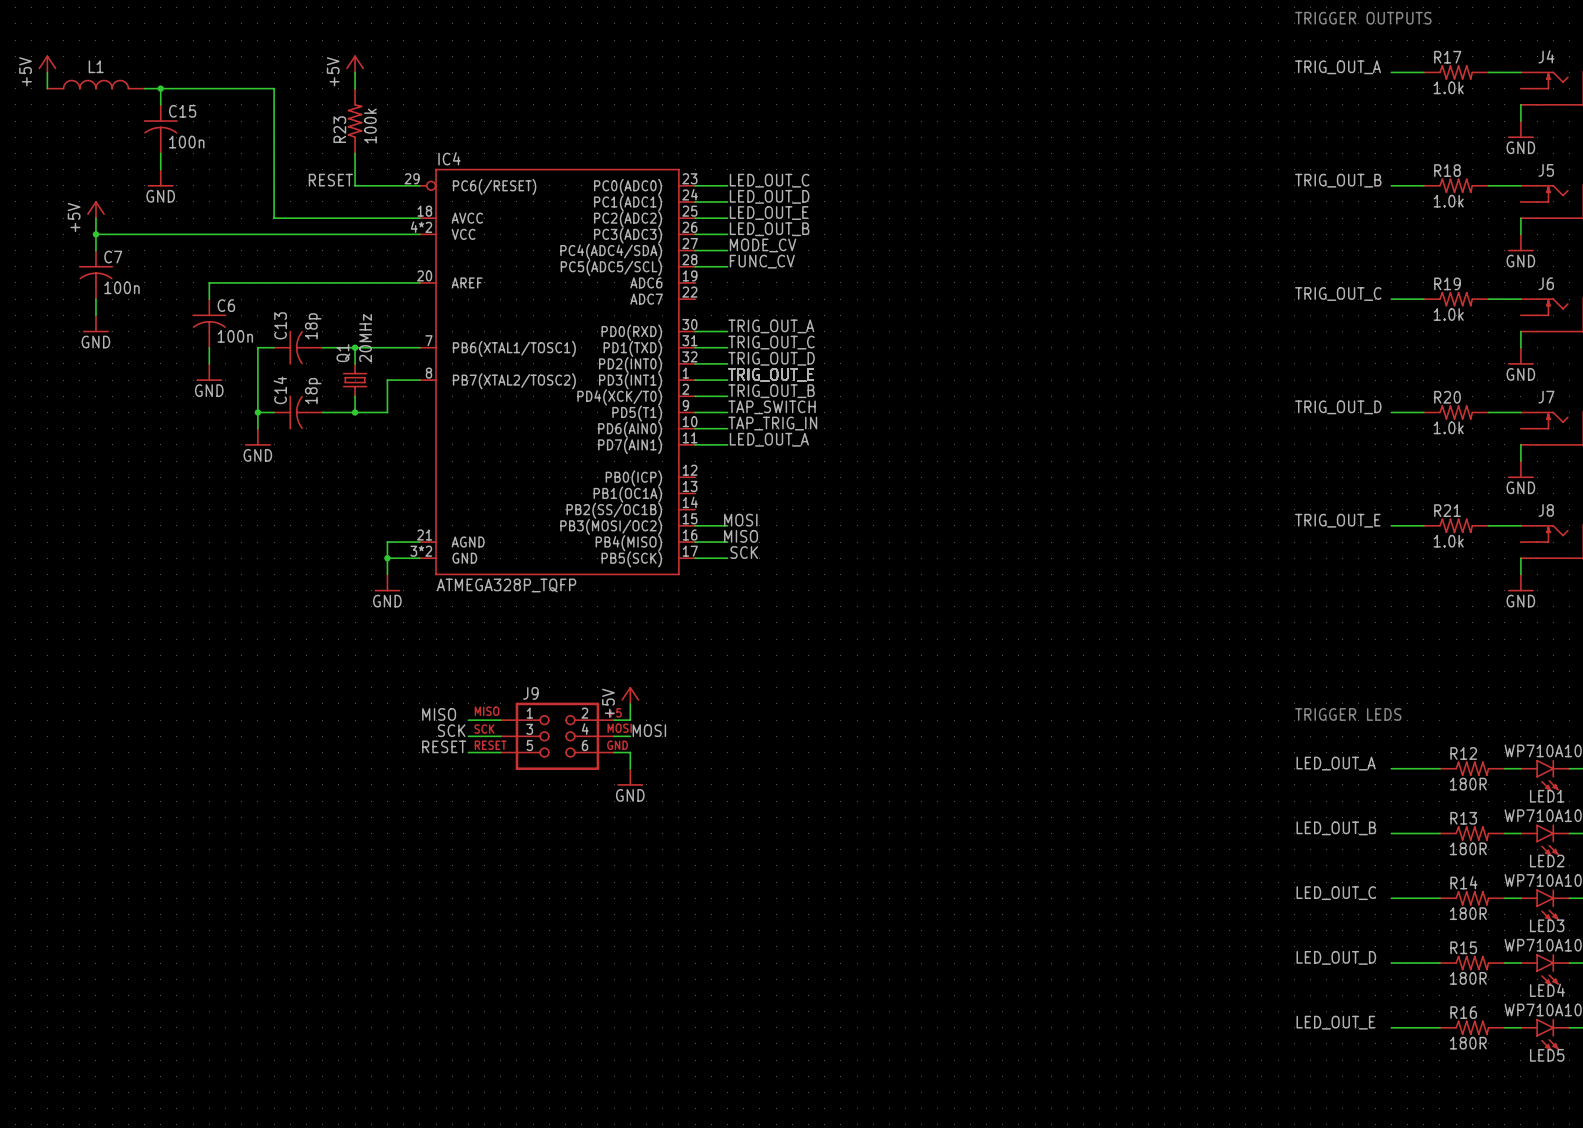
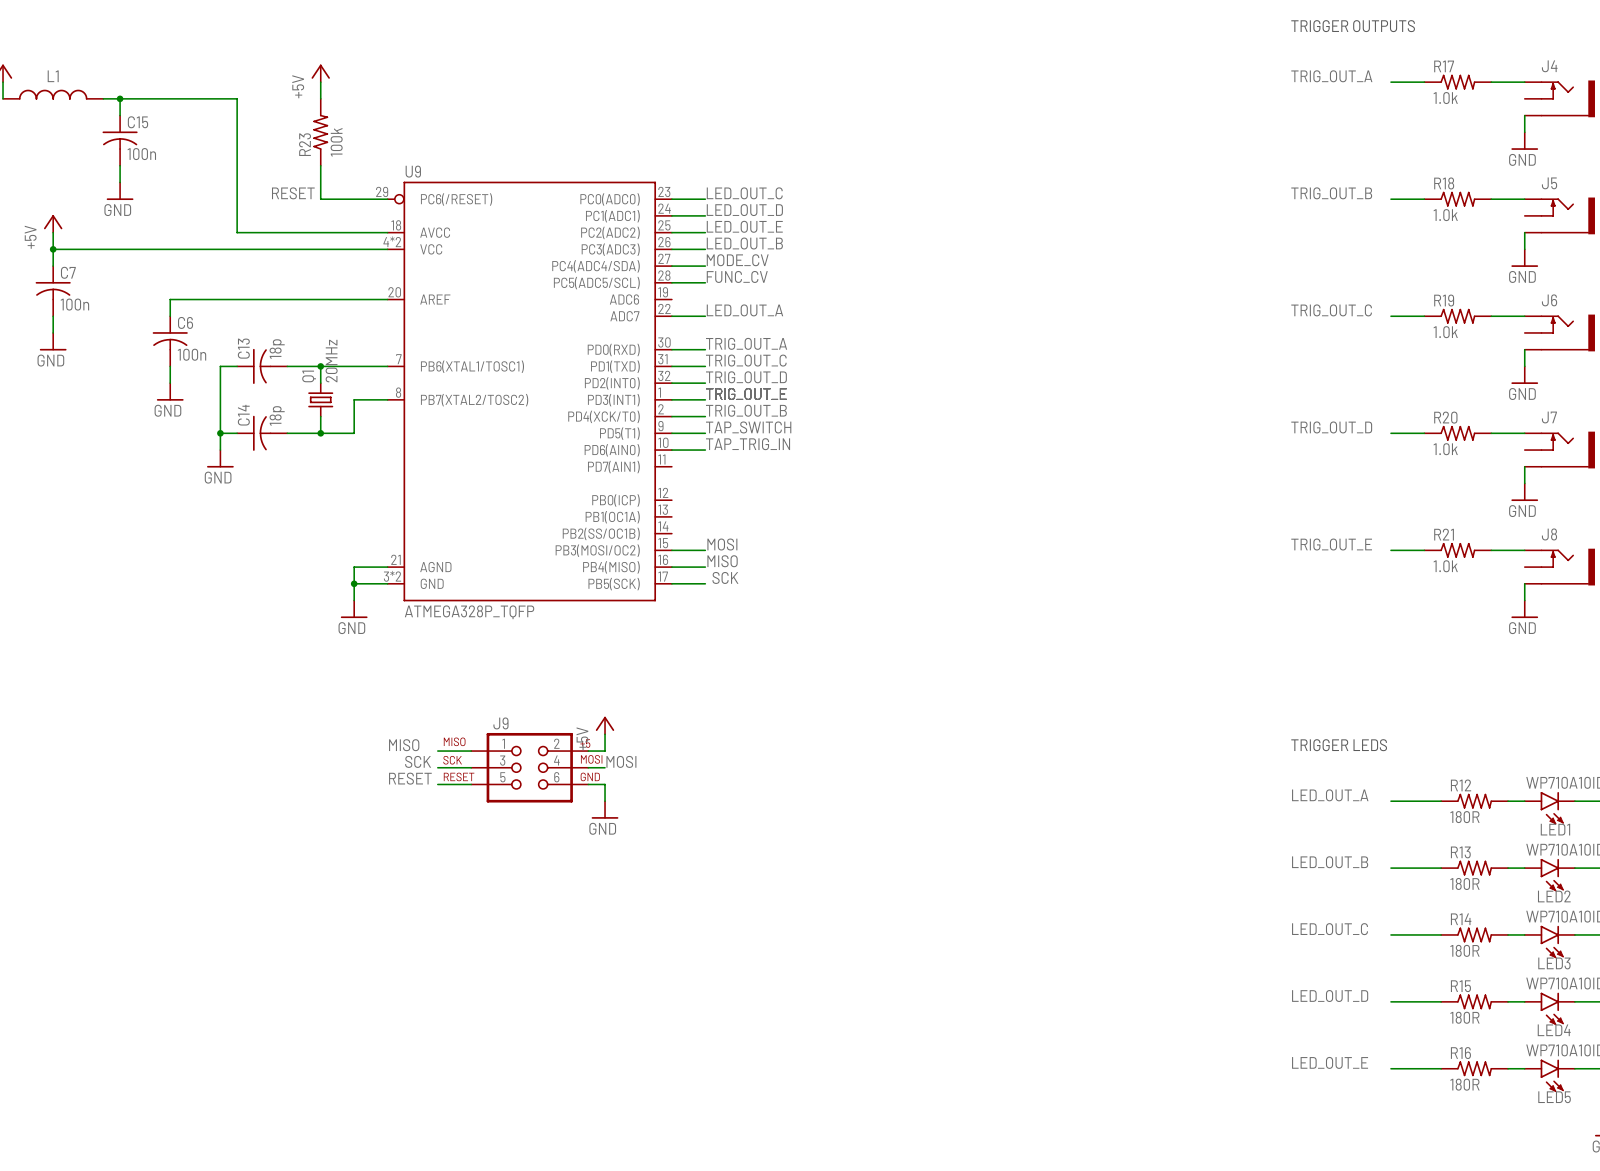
IC4 name: IC4 (449, 158) -> U9 (413, 171)
label position: LED_OUT_A (769, 439) -> LED_OUT_A (744, 310)
wire: (695, 444) (727, 444) -> (671, 316) (705, 316)

